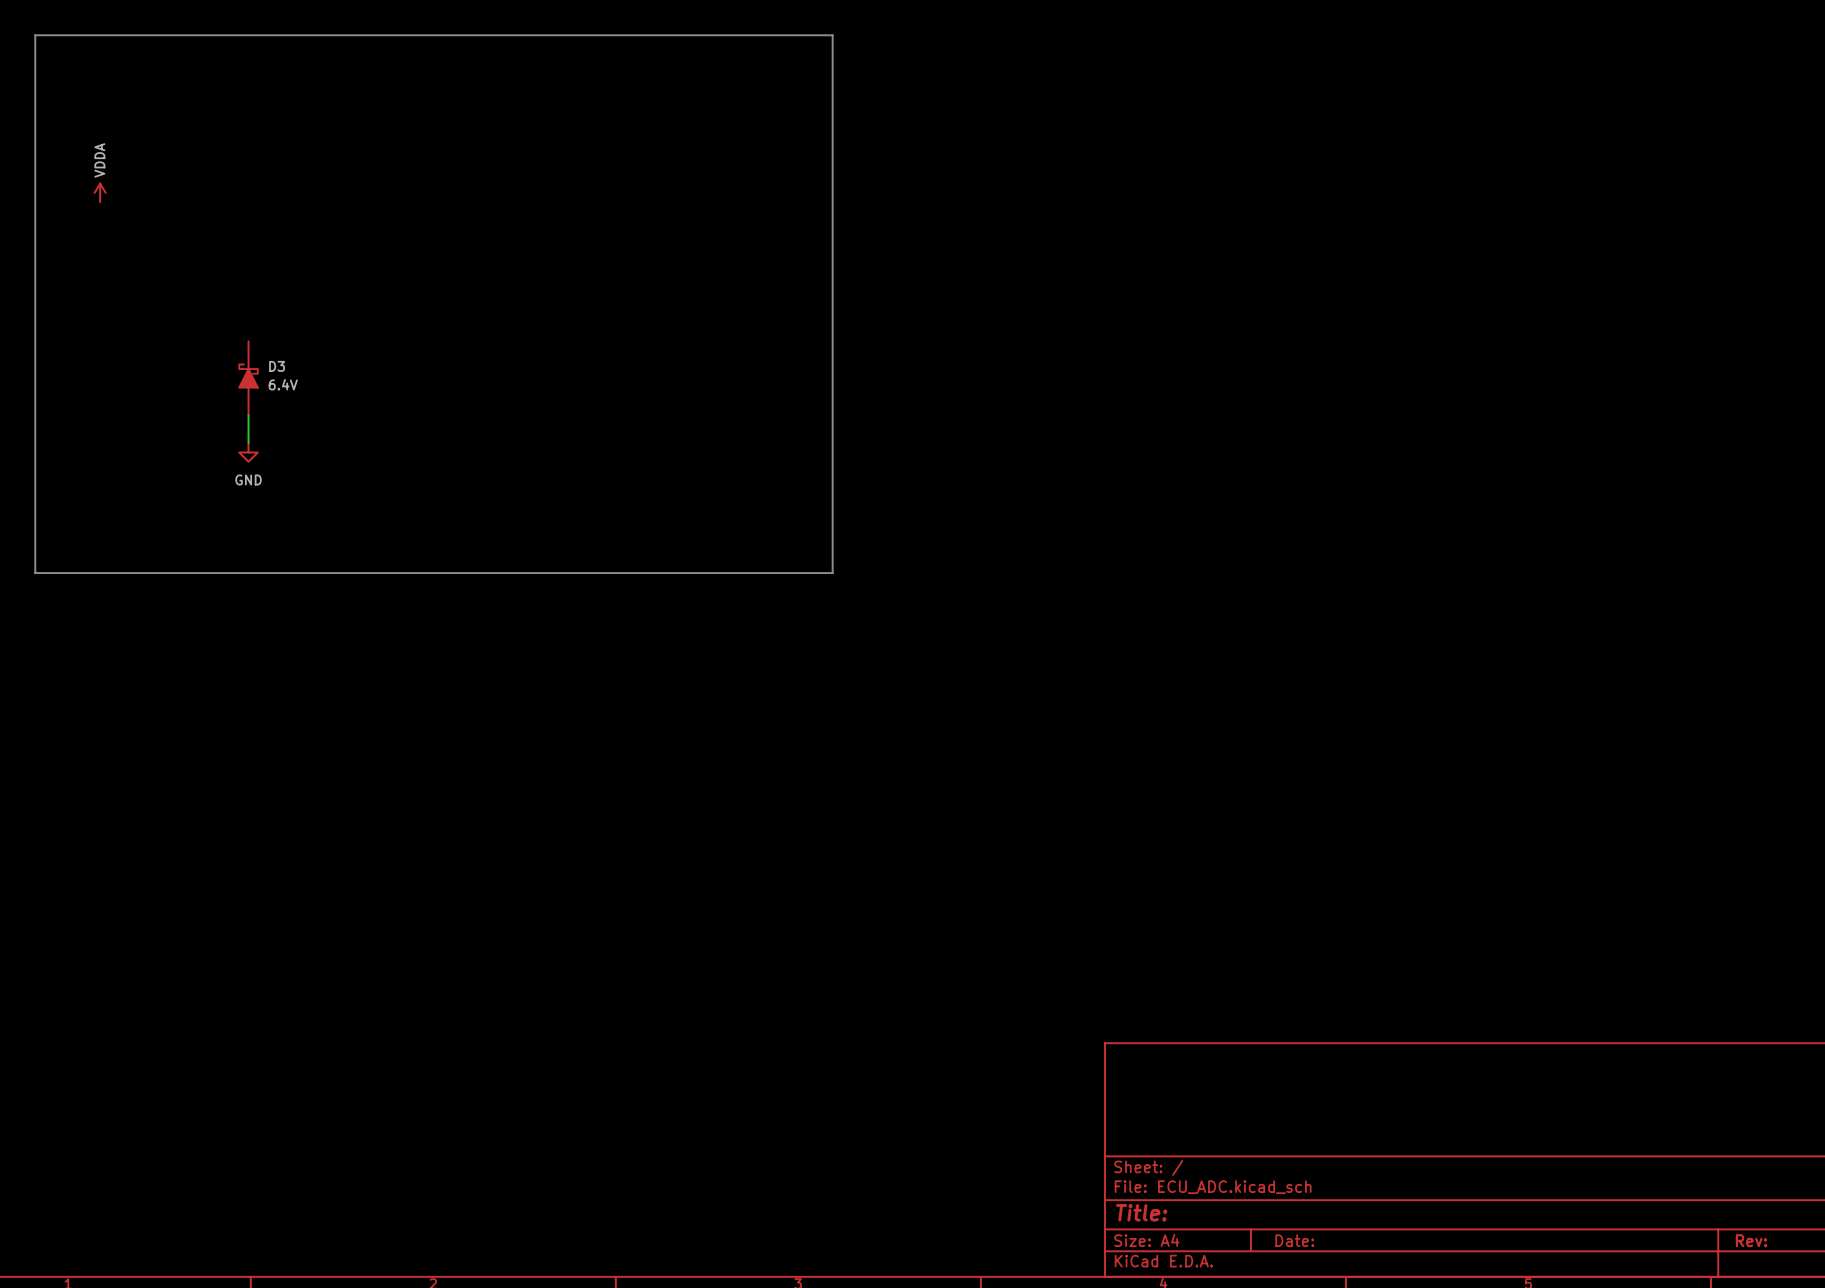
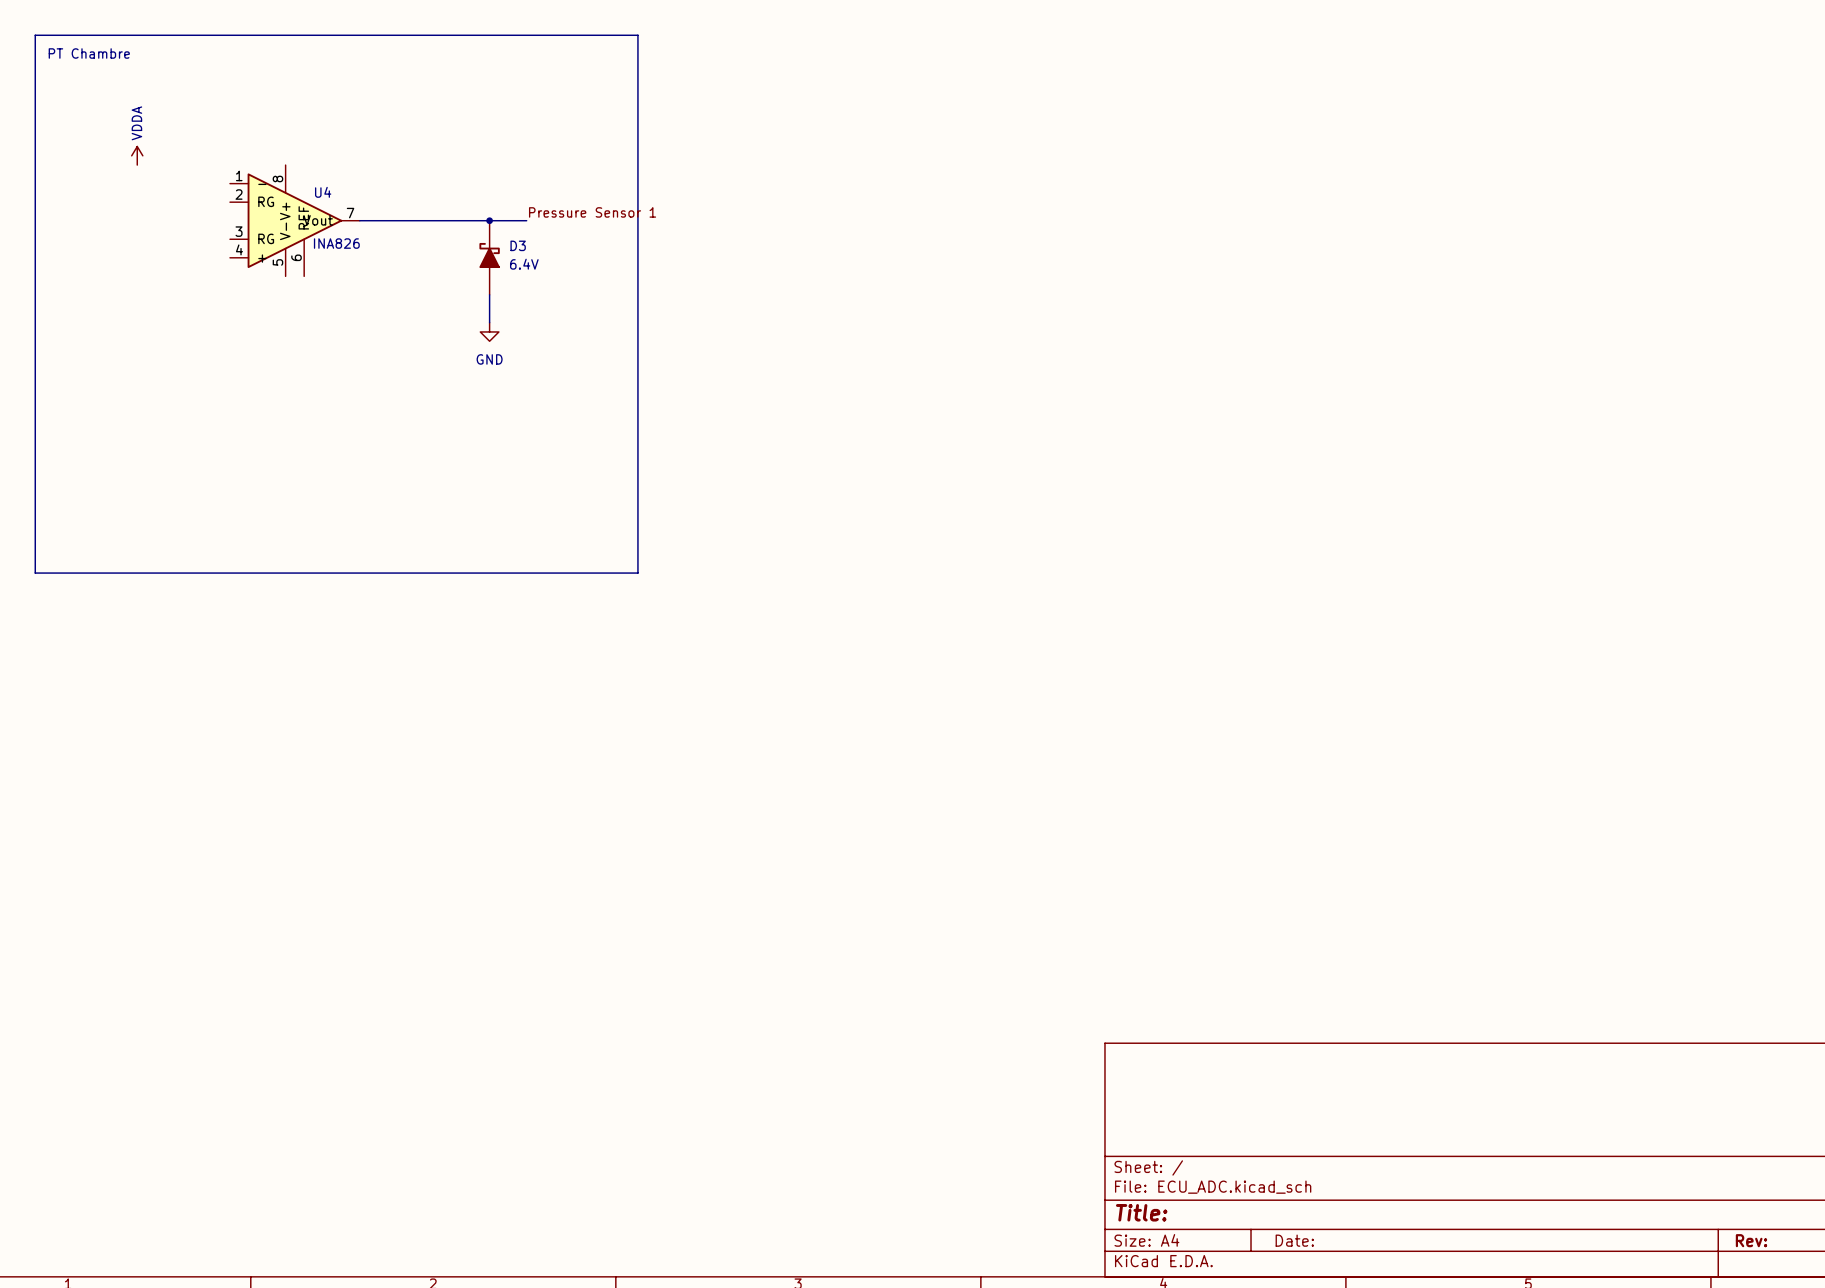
line: (637, 35) (832, 35) (832, 573) (637, 573) -> (637, 35) (637, 573)
text: none -> PT Chambre (89, 53)
power symbol position: VDDA (100, 192) -> VDDA (137, 155)
label: none -> Pressure Sensor 1 (592, 212)
U4: none -> INA826 (294, 220)
wire: none -> (359, 220) (526, 220)
junction: none -> (489, 220)
wire: none -> (489, 294) (489, 322)
power symbol: none -> GND (489, 331)
D3 position: (248, 378) -> (489, 257)
wire: (248, 415) (248, 443) -> none
power symbol: GND (248, 452) -> none

